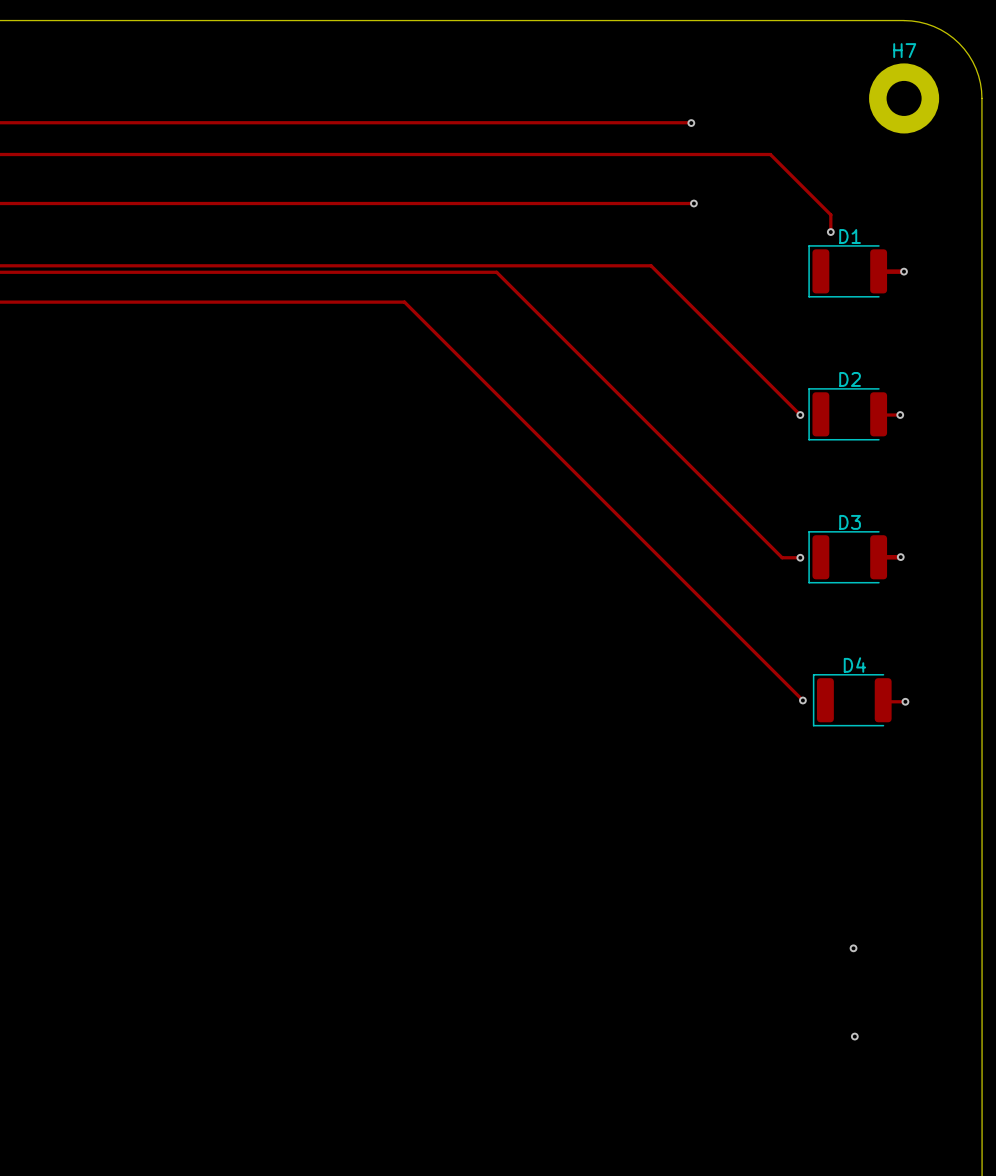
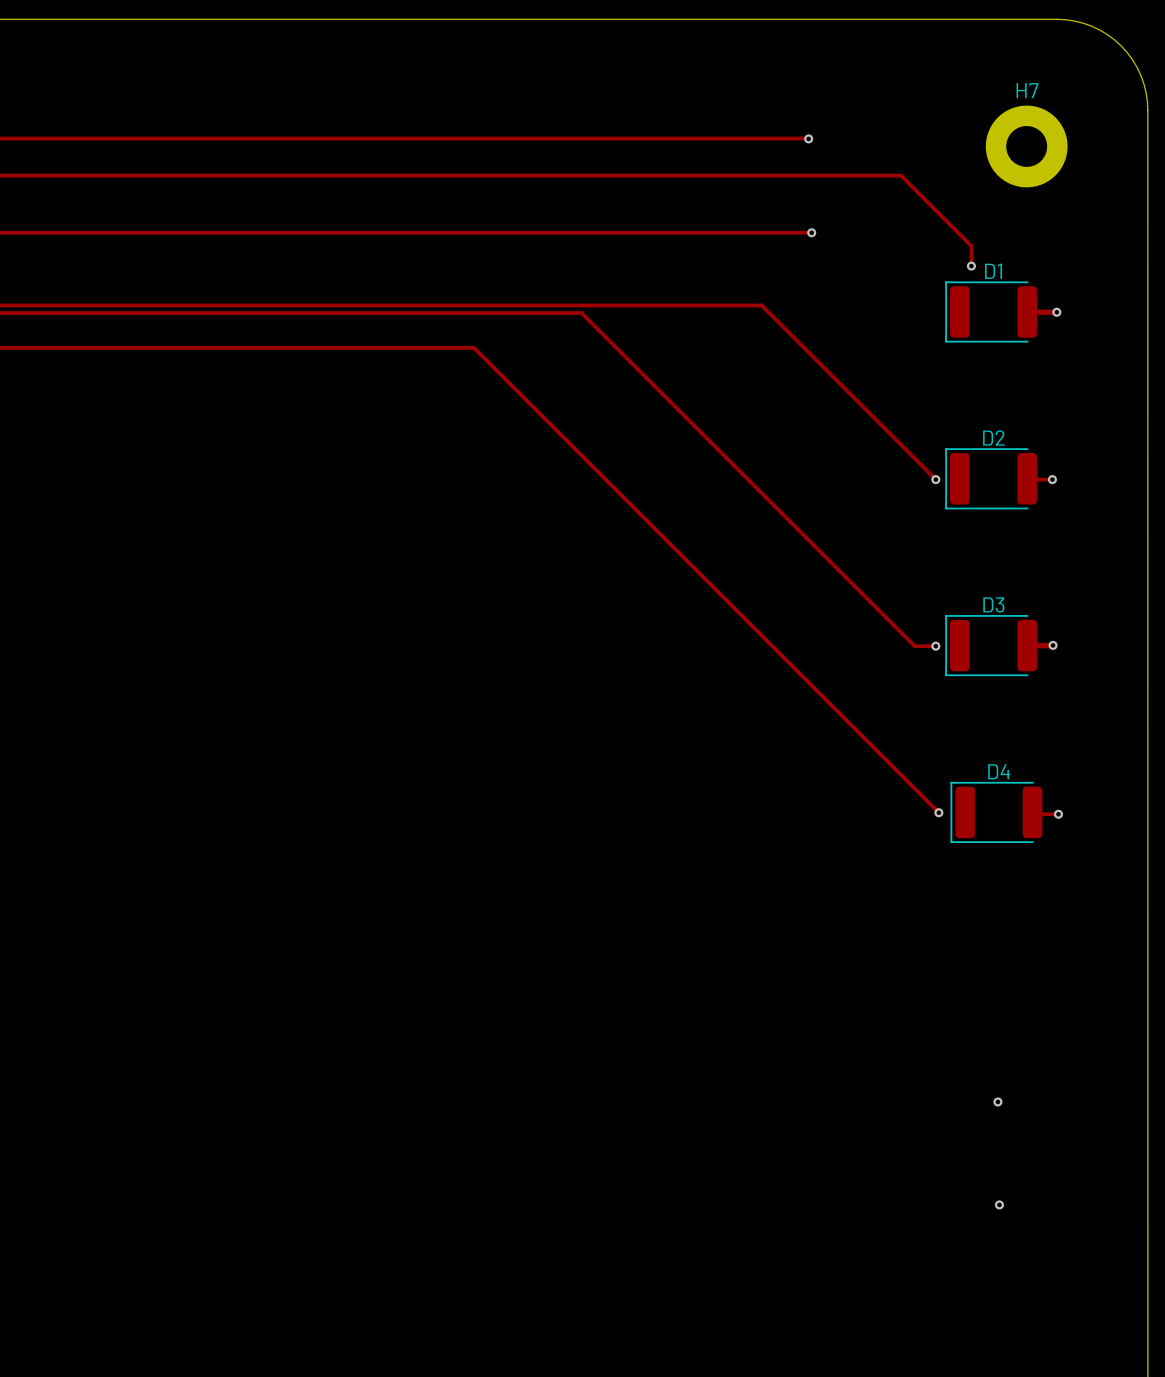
H7 position: (904, 98) -> (1026, 146)

